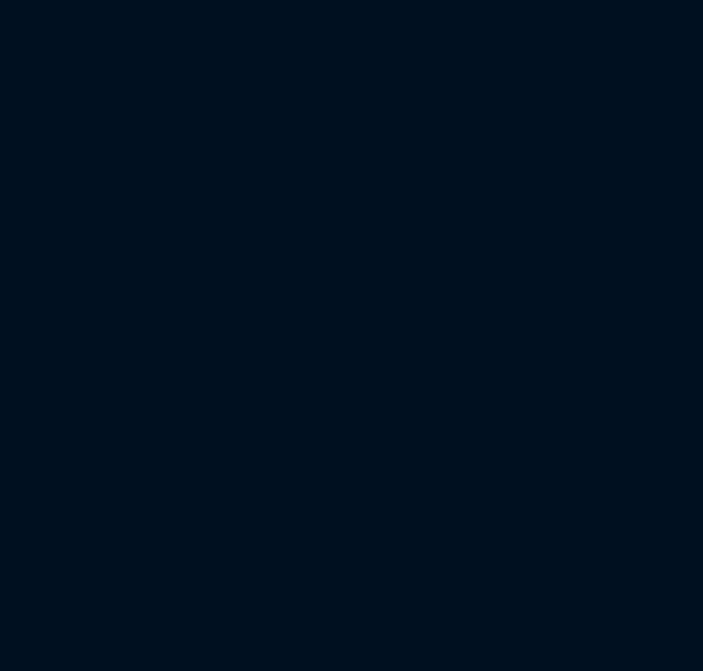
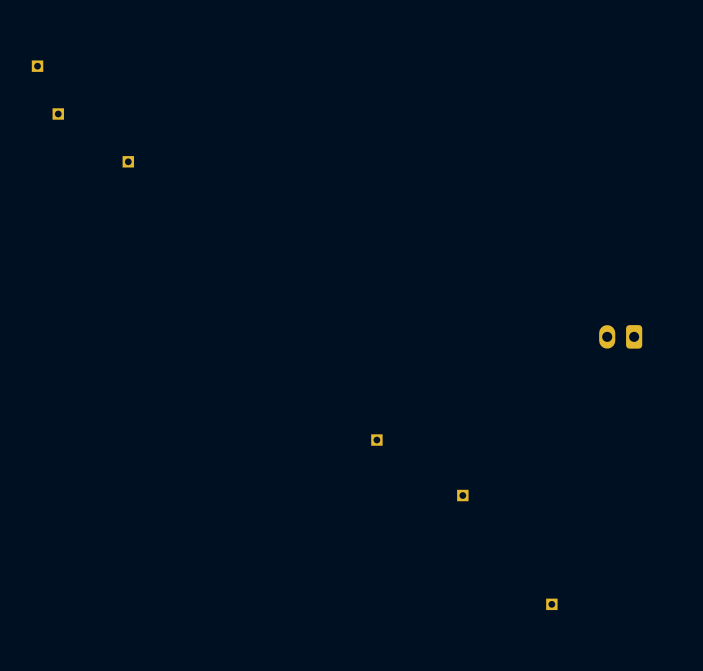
part: none -> (37, 66)
part: none -> (58, 113)
part: none -> (128, 161)
part: none -> (620, 336)
part: none -> (376, 440)
part: none -> (462, 495)
part: none -> (551, 604)

